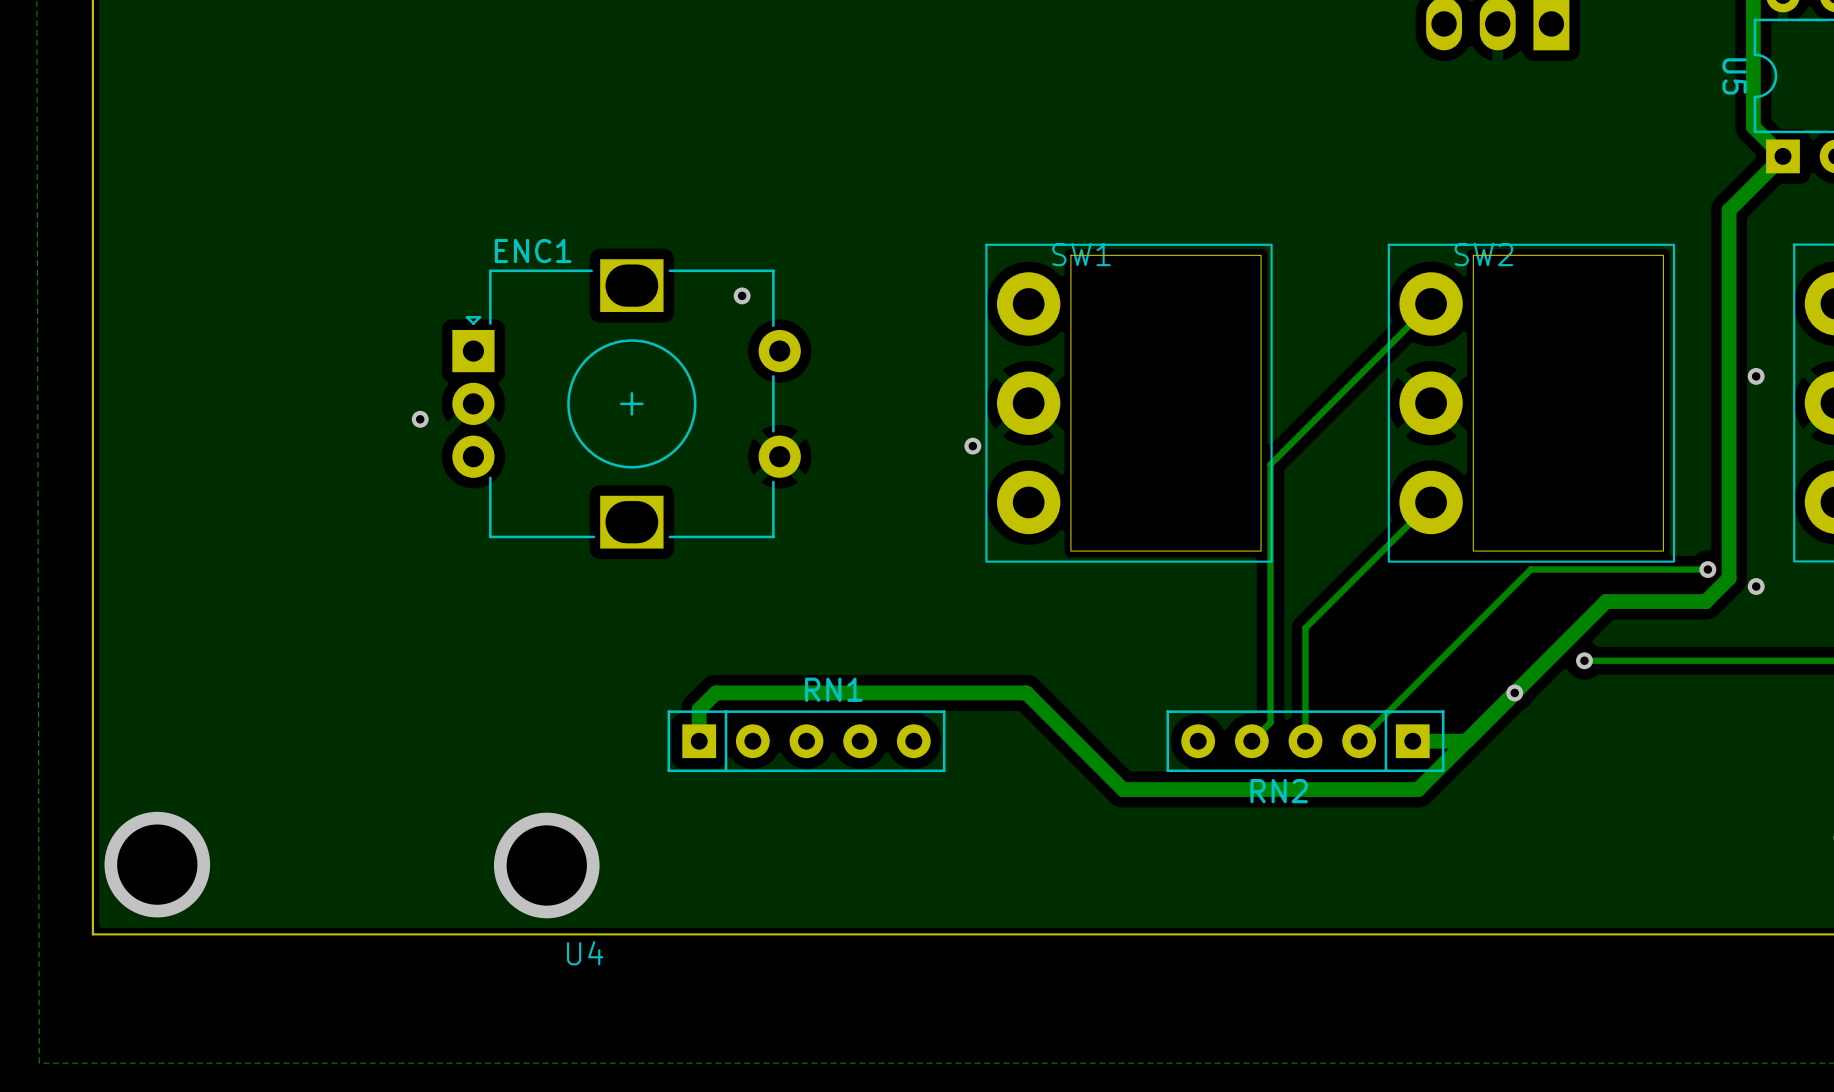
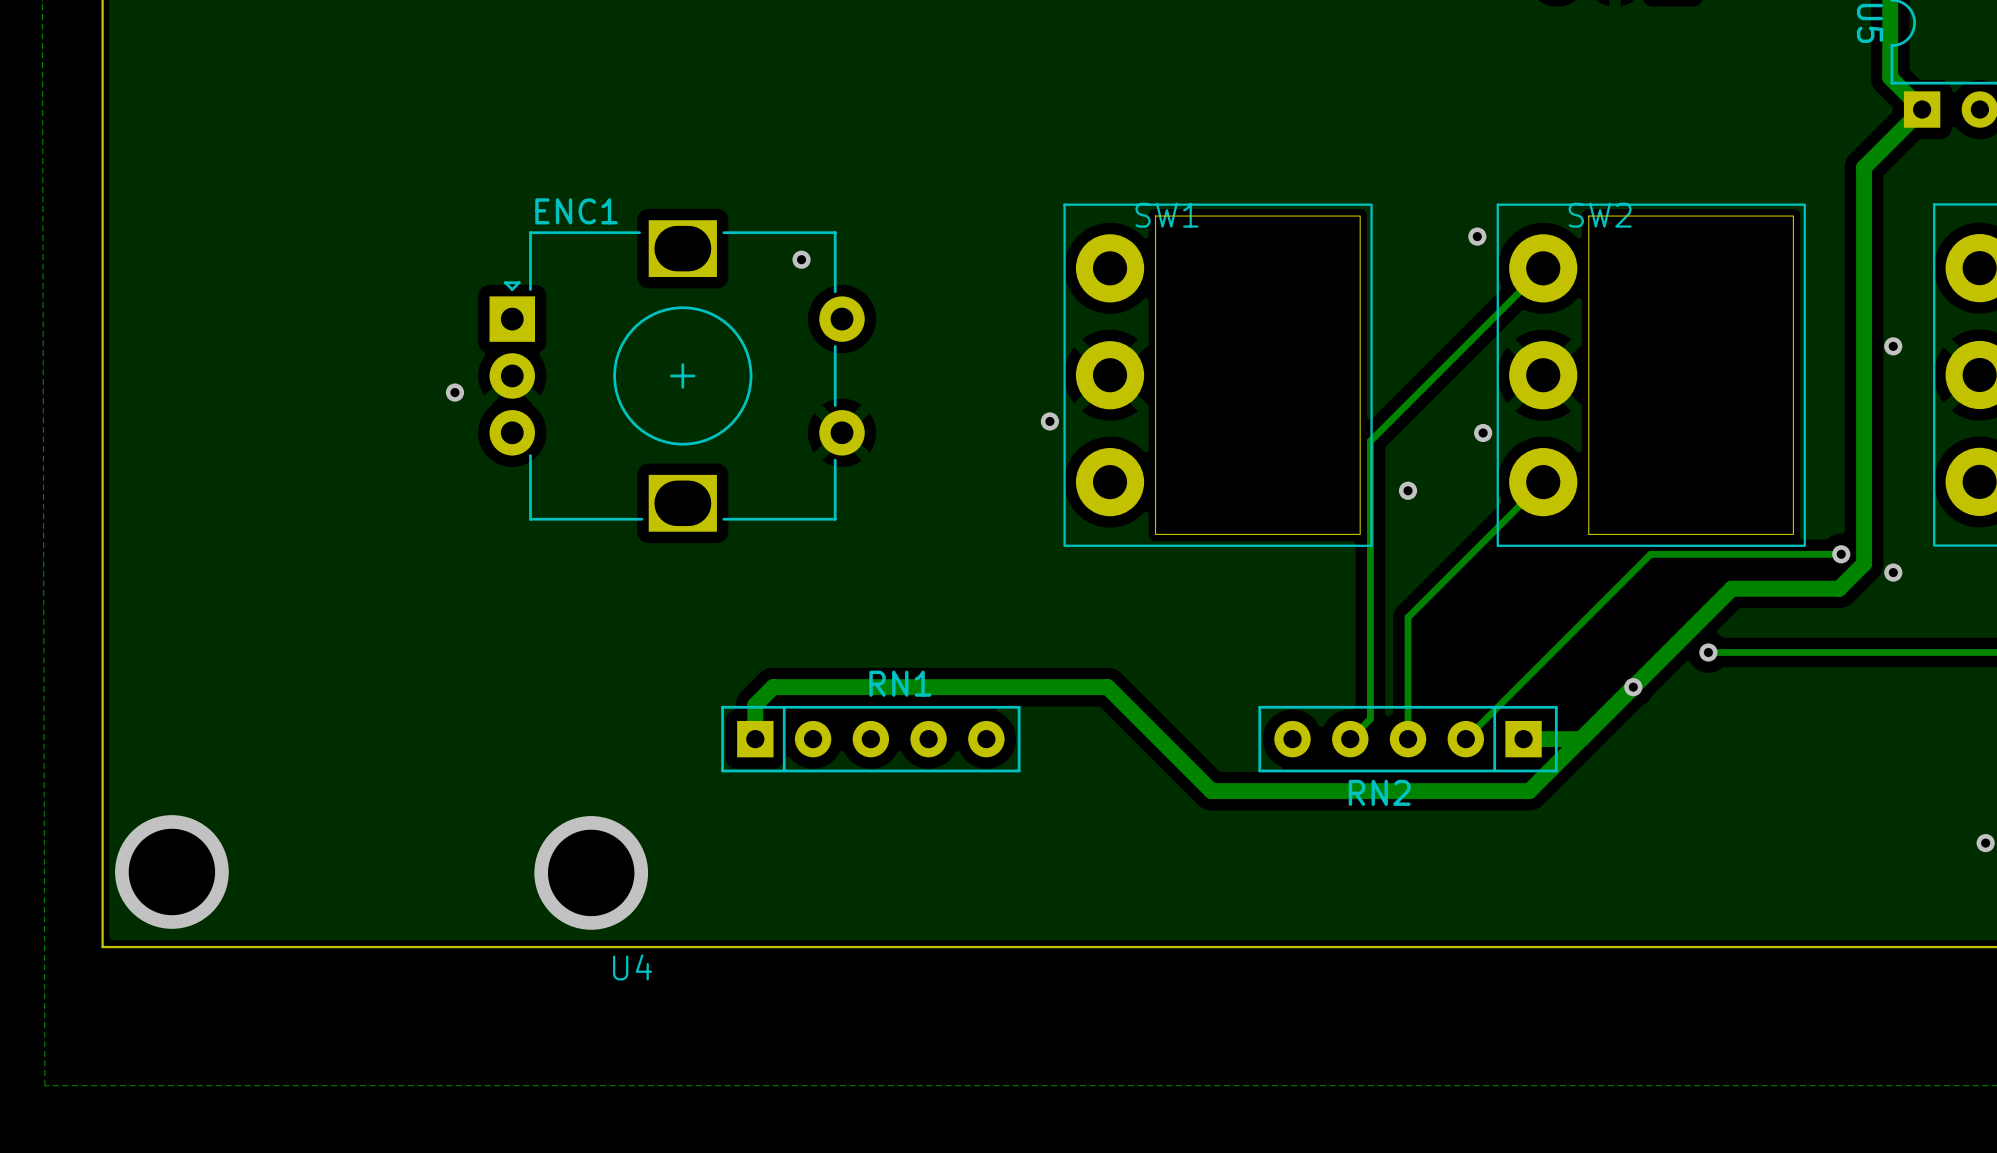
via: none -> (1477, 236)
via: none -> (1483, 432)
via: none -> (1408, 490)

